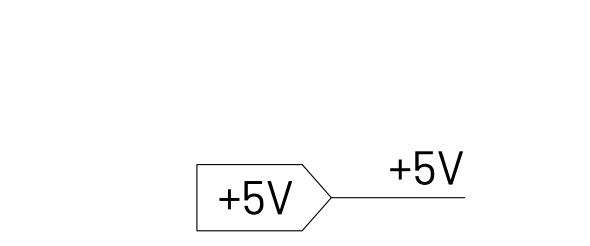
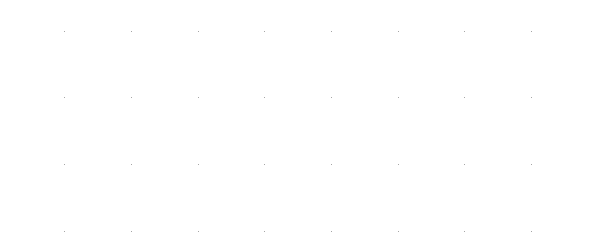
label: +5V (426, 168) -> none
global label: +5V (255, 197) -> none
wire: (331, 197) (464, 197) -> none

